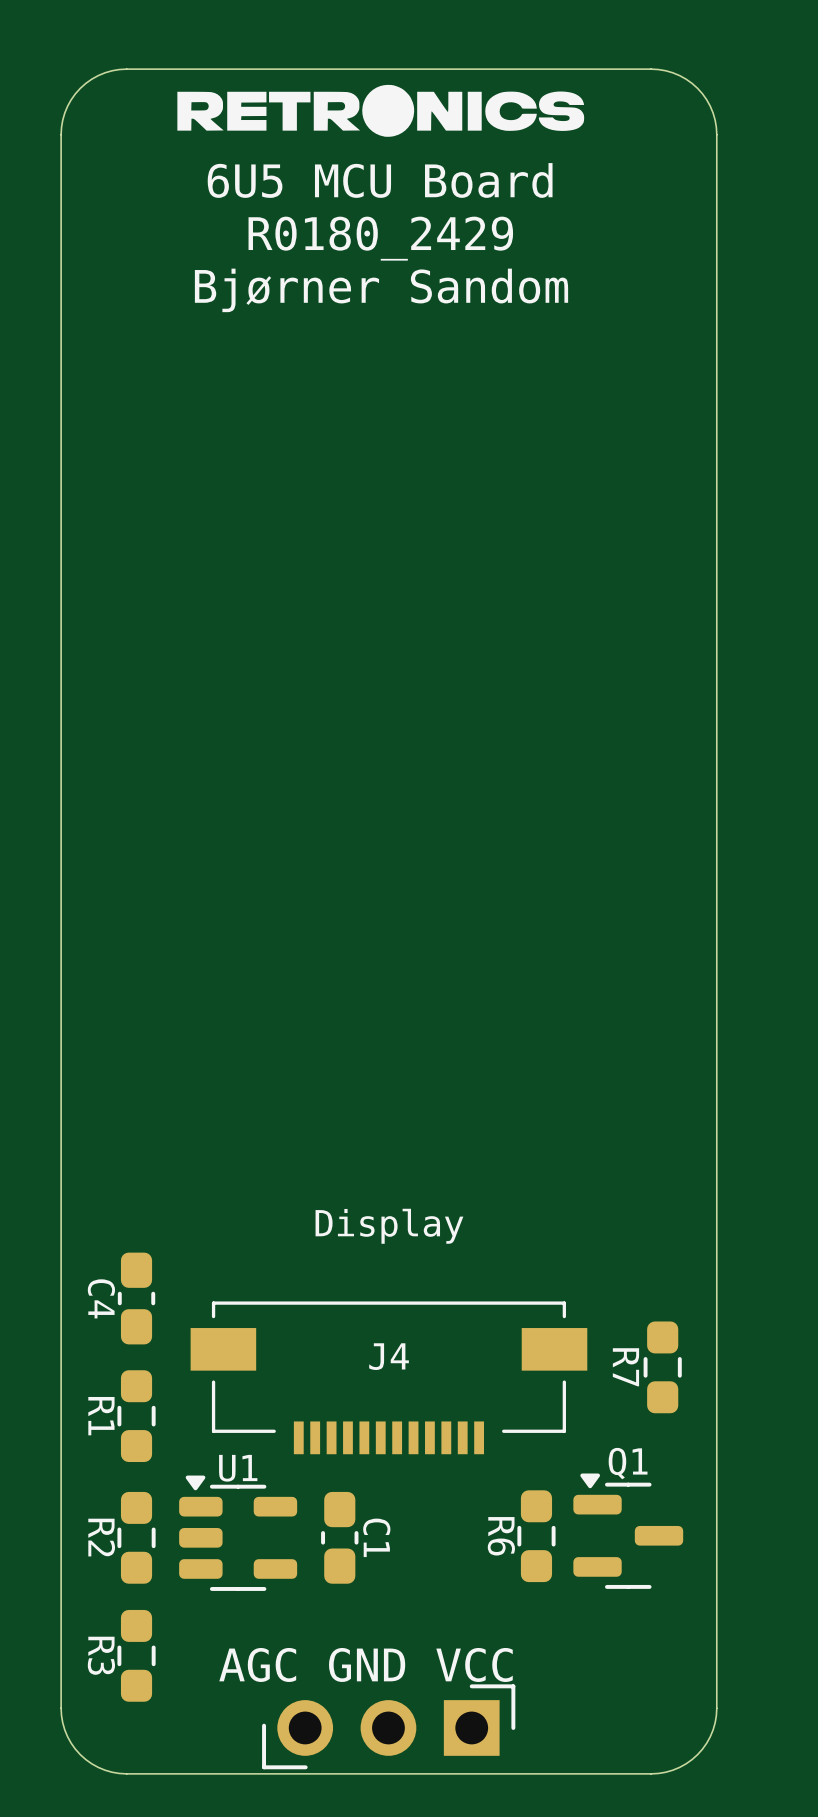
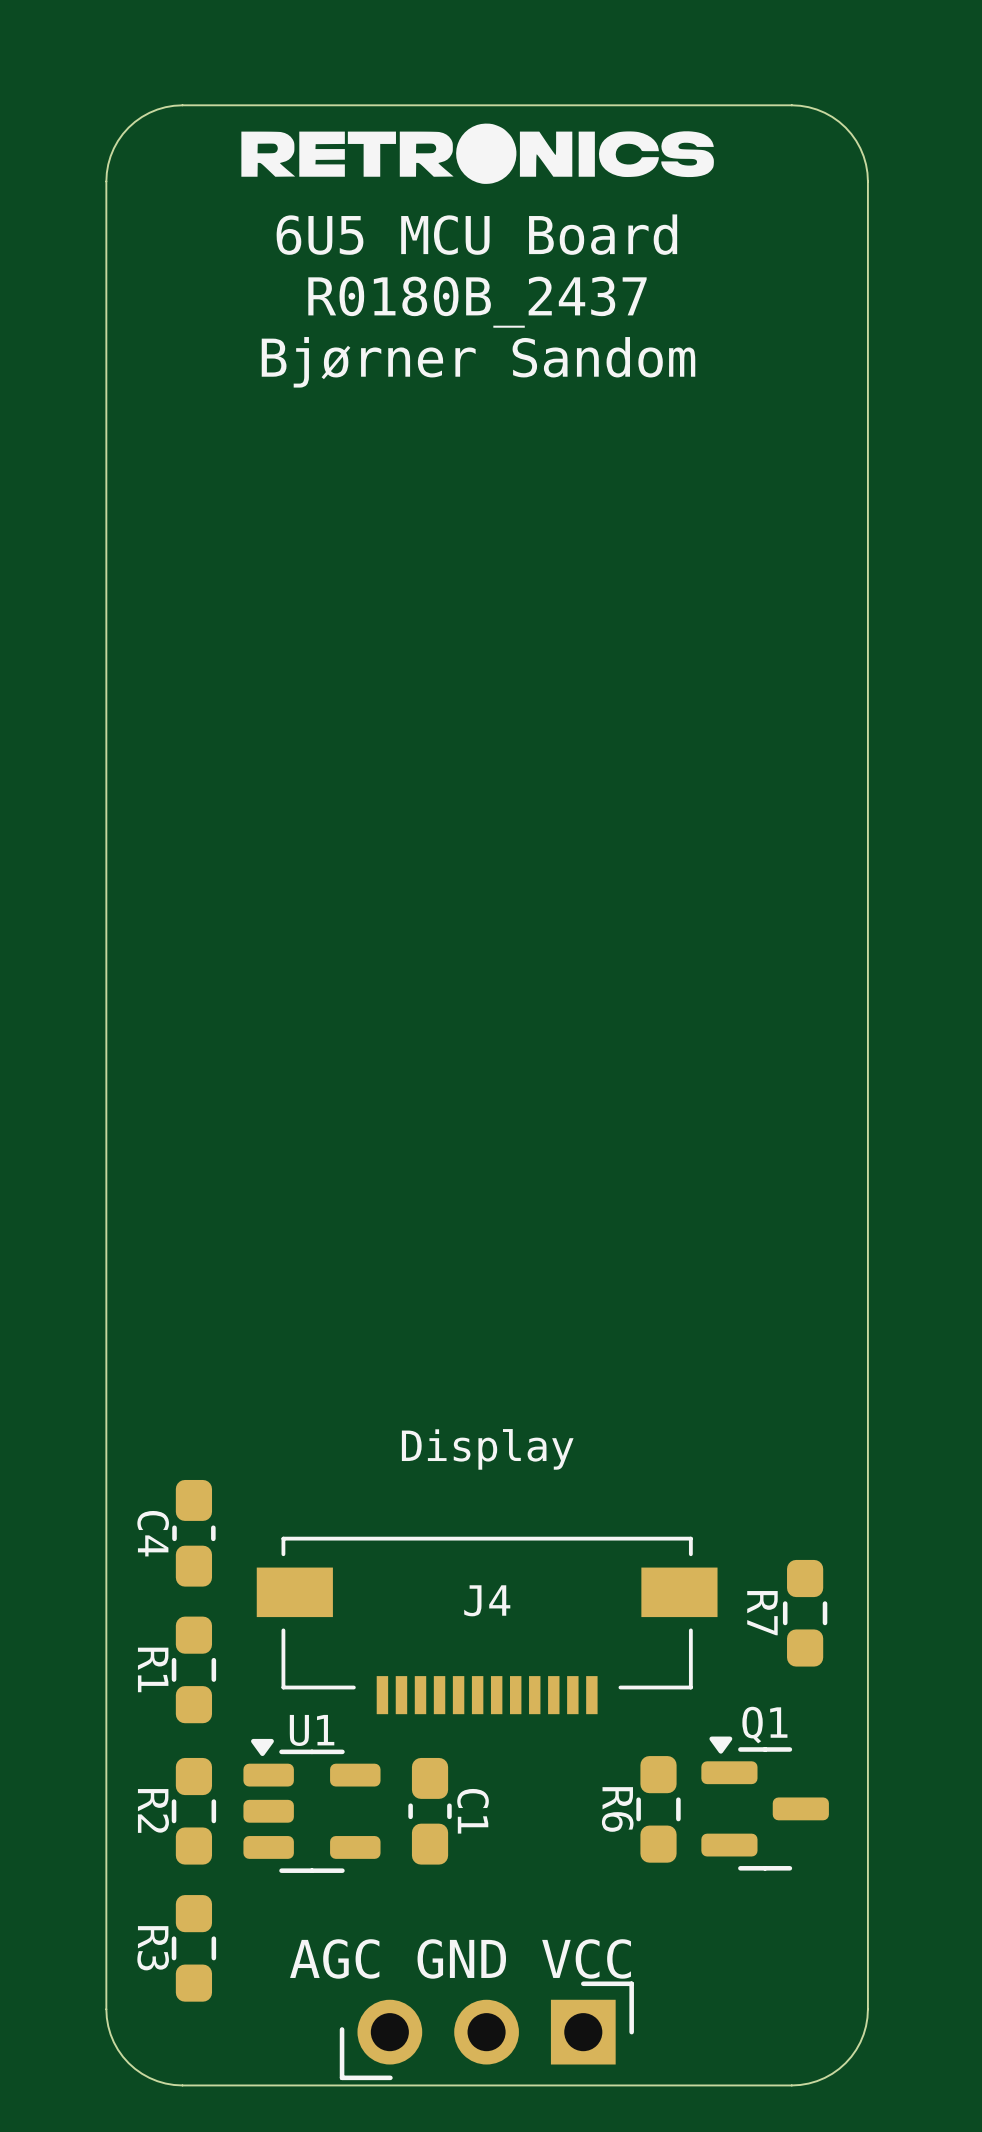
text: R0180_2429 (380, 238) -> R0180B_2437 (477, 302)

